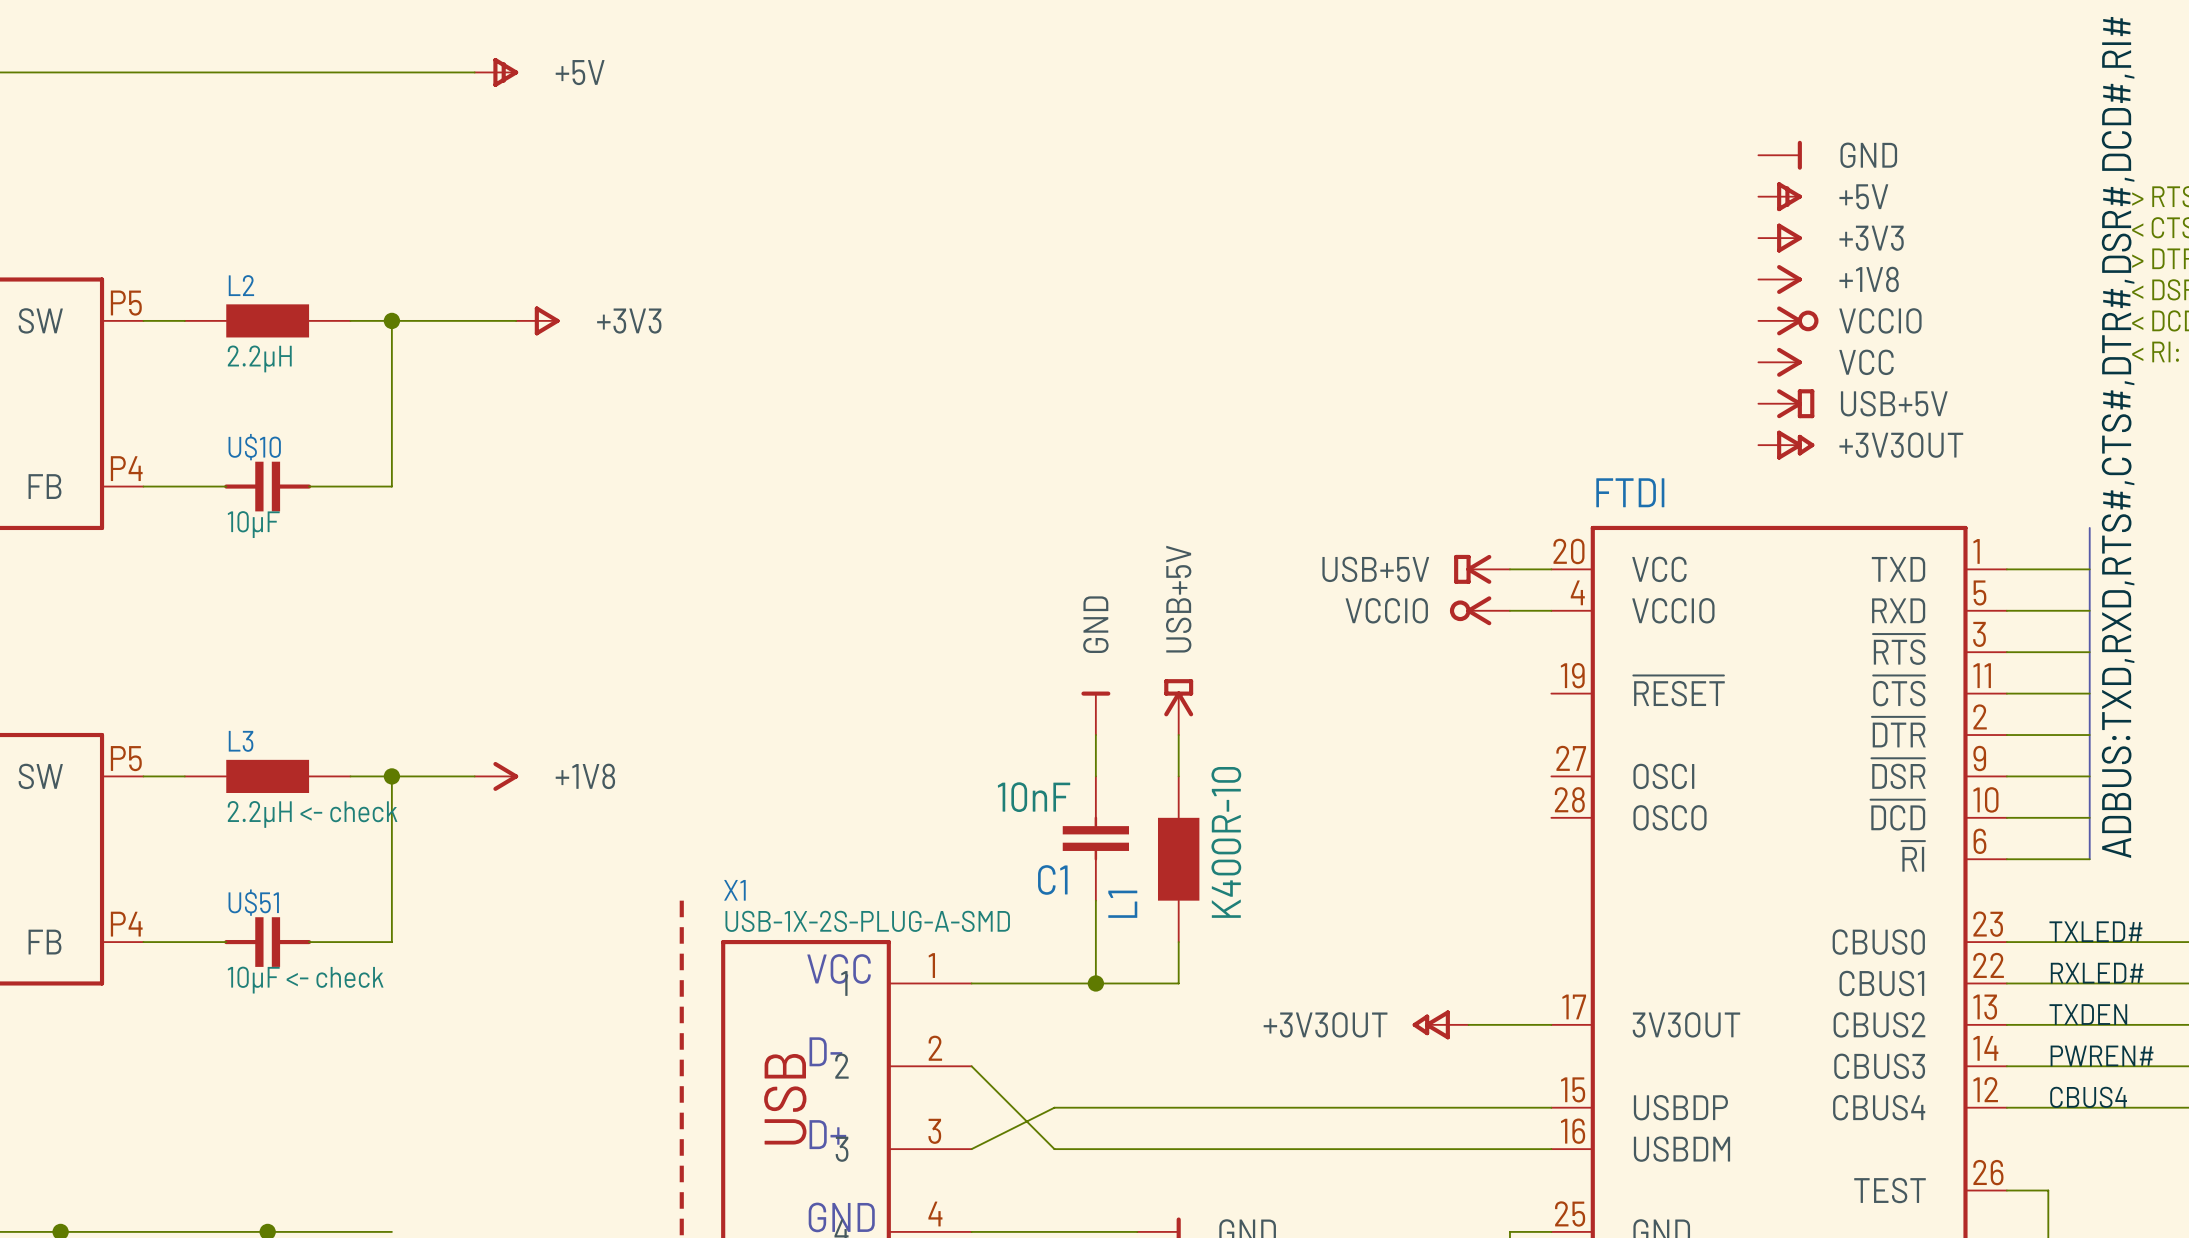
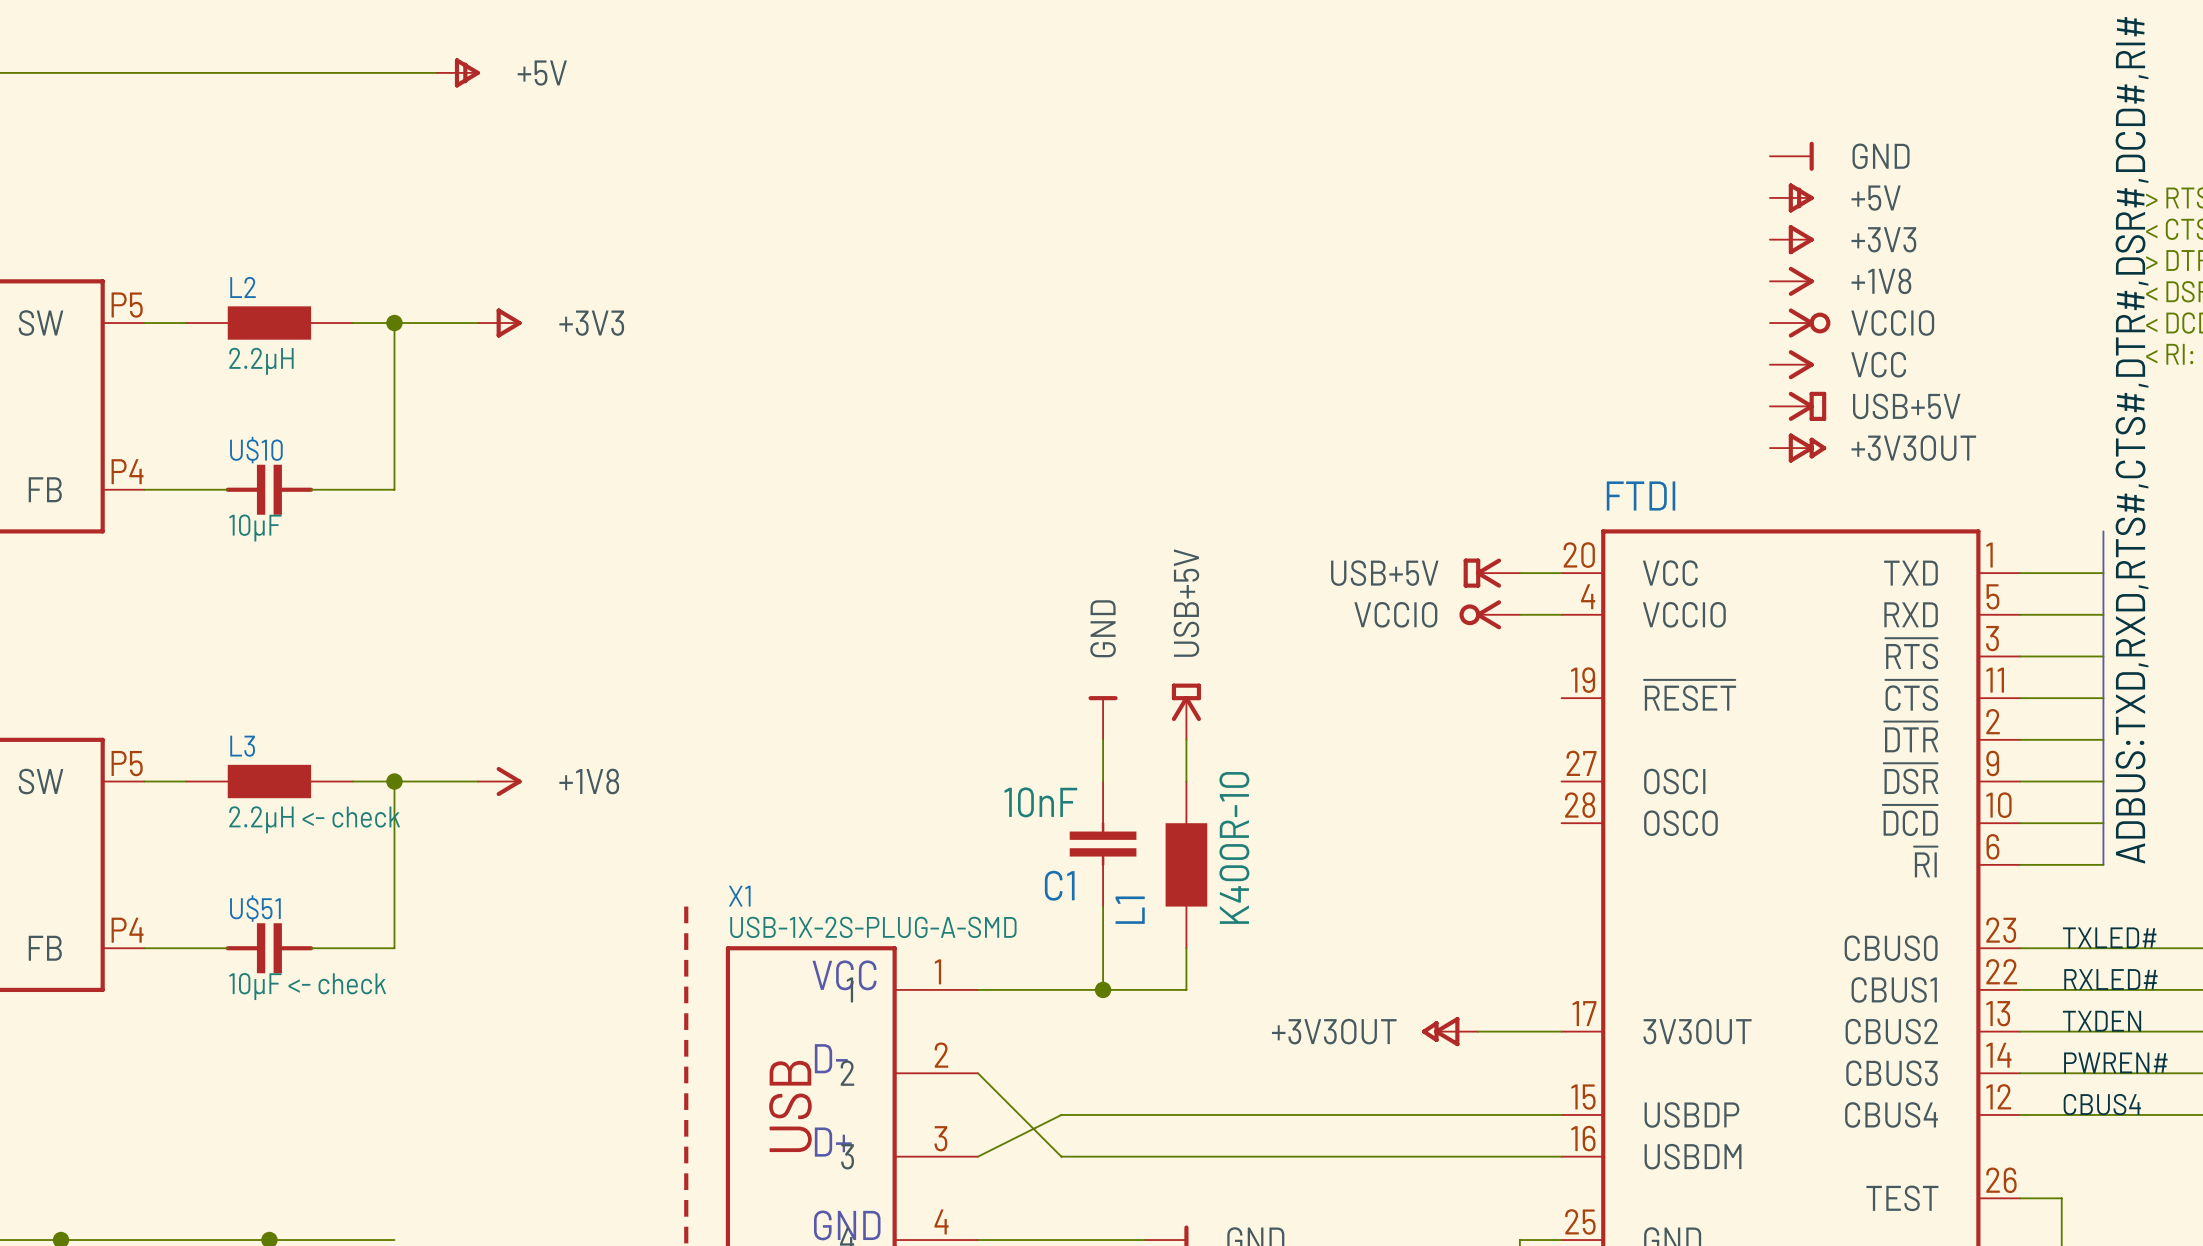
power symbol position: (496, 72) -> (458, 72)
power symbol position: (537, 320) -> (499, 323)

